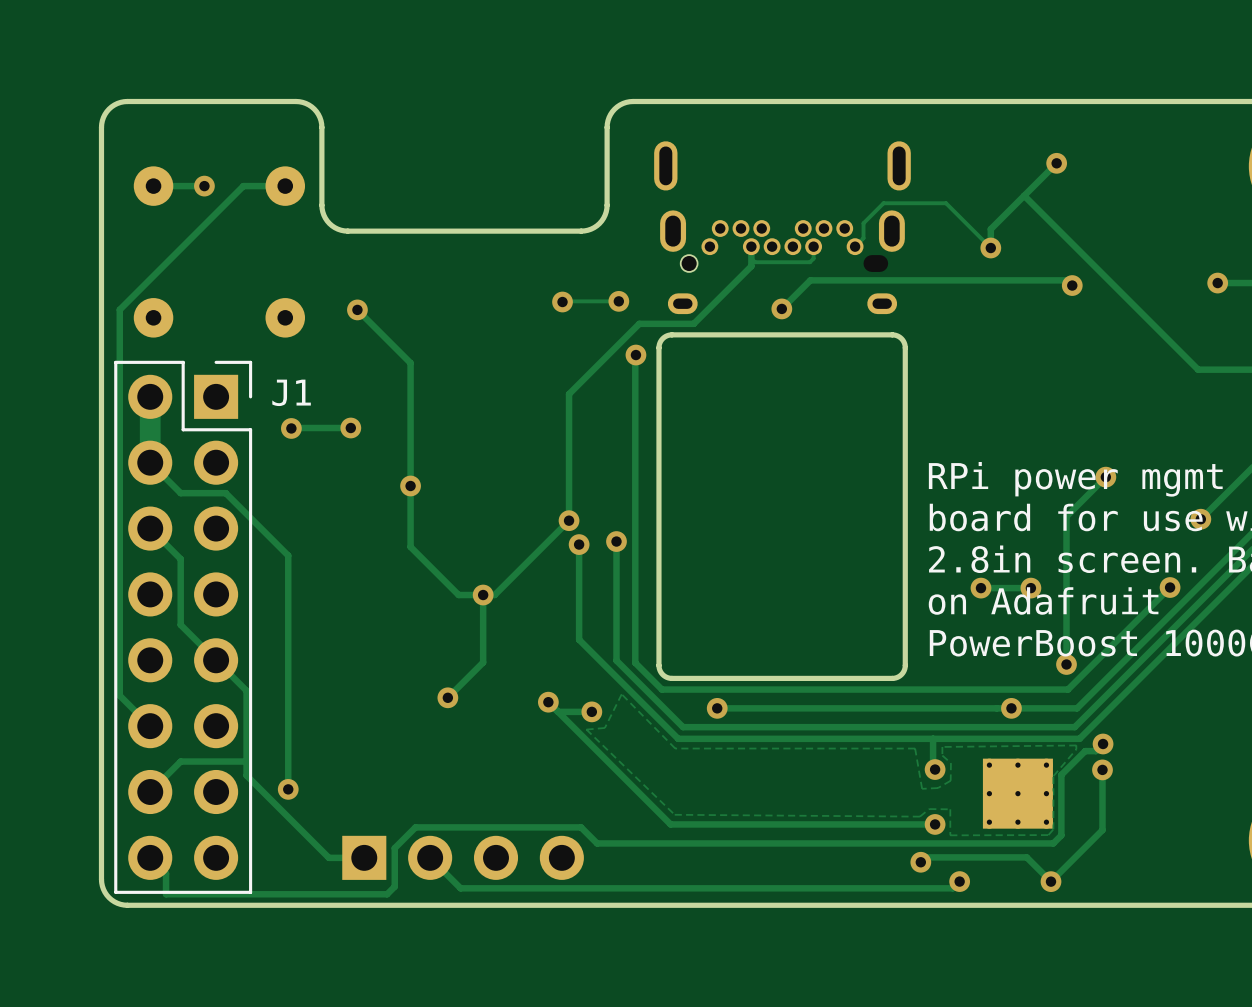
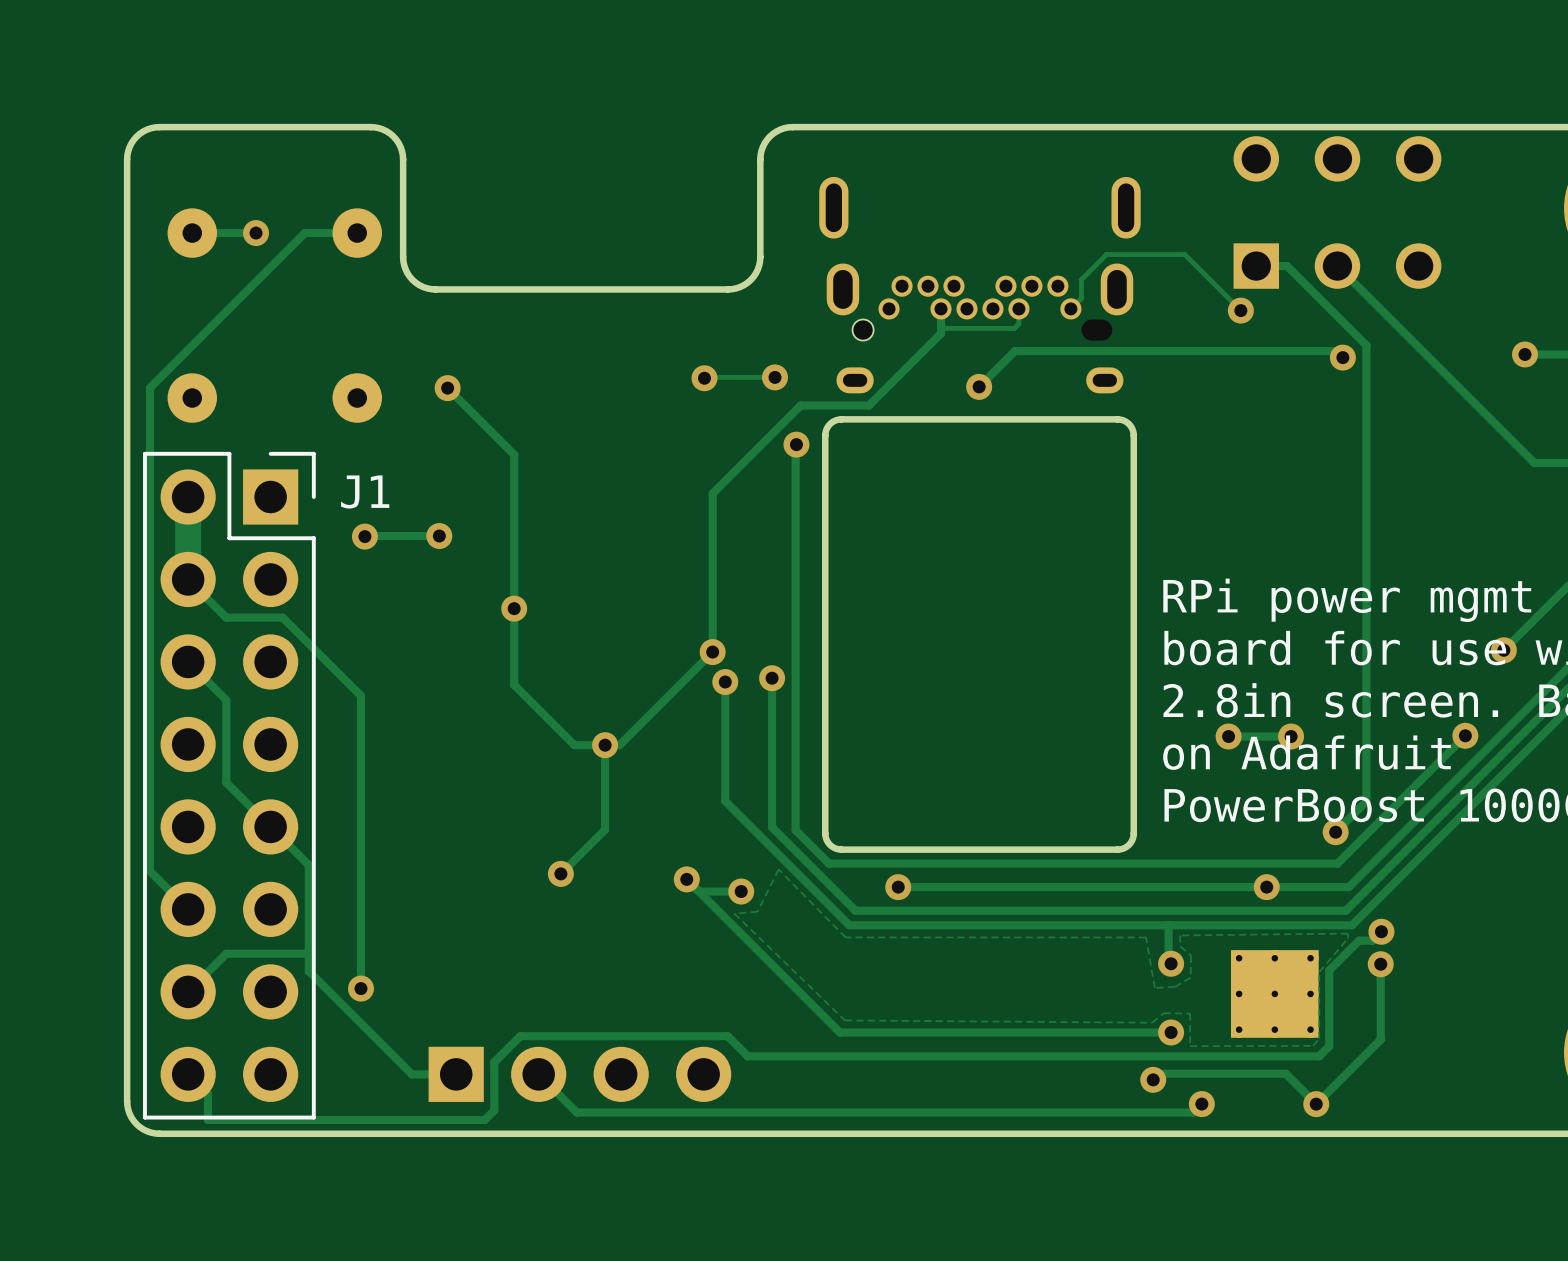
track: (1056, 163) (990, 229) (990, 248) -> none
via: (1056, 163) -> none
part: none -> (1337, 212)
track: (1024, 195) (1198, 369) (1225, 369) -> (1337, 266) (1534, 462)
track: (1105, 477) (1066, 516) (1066, 664) -> (1256, 266) (1287, 266) (1366, 345) (1366, 801) (1335, 832)
via: (1105, 477) -> none

